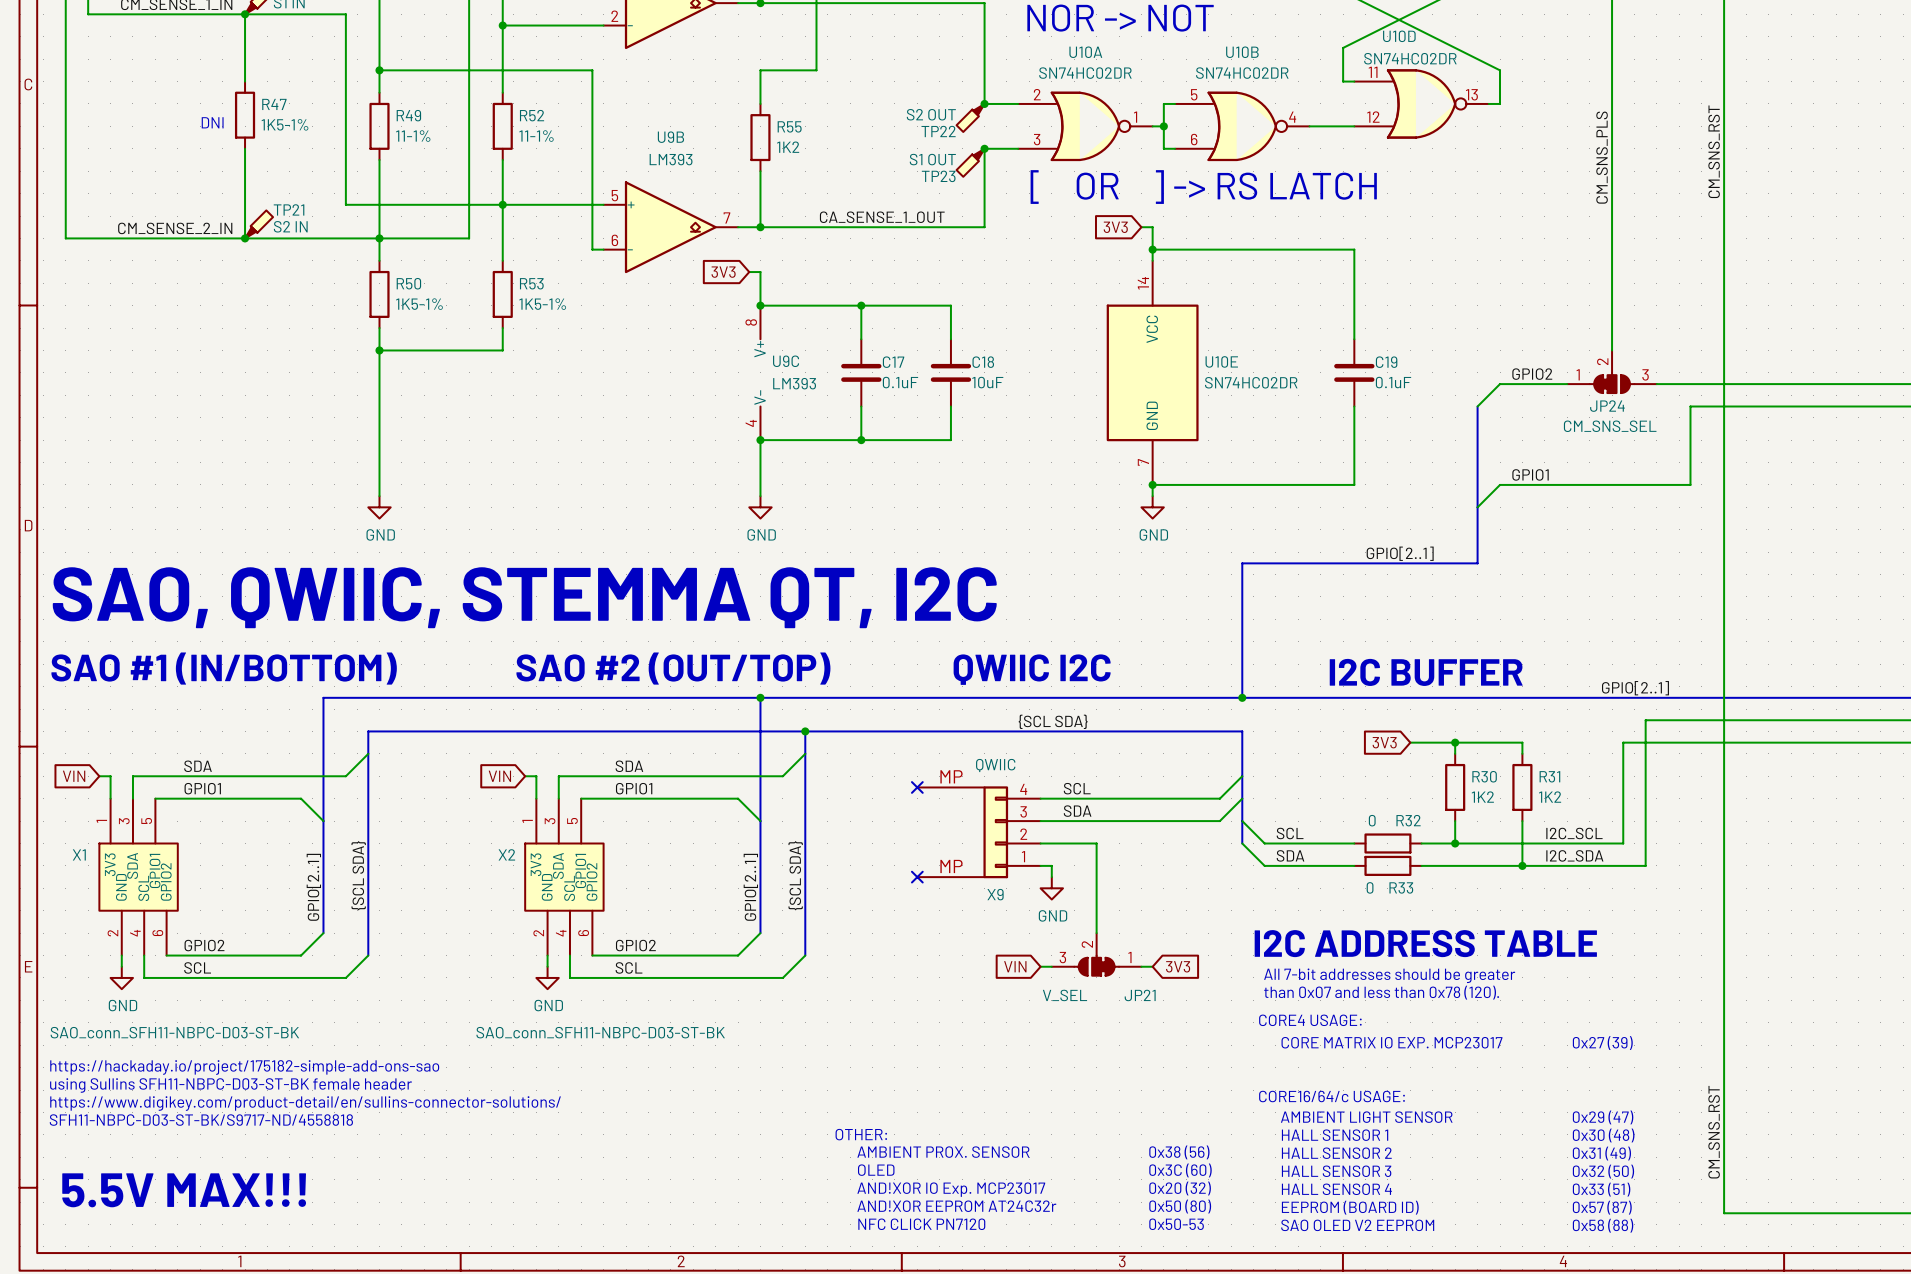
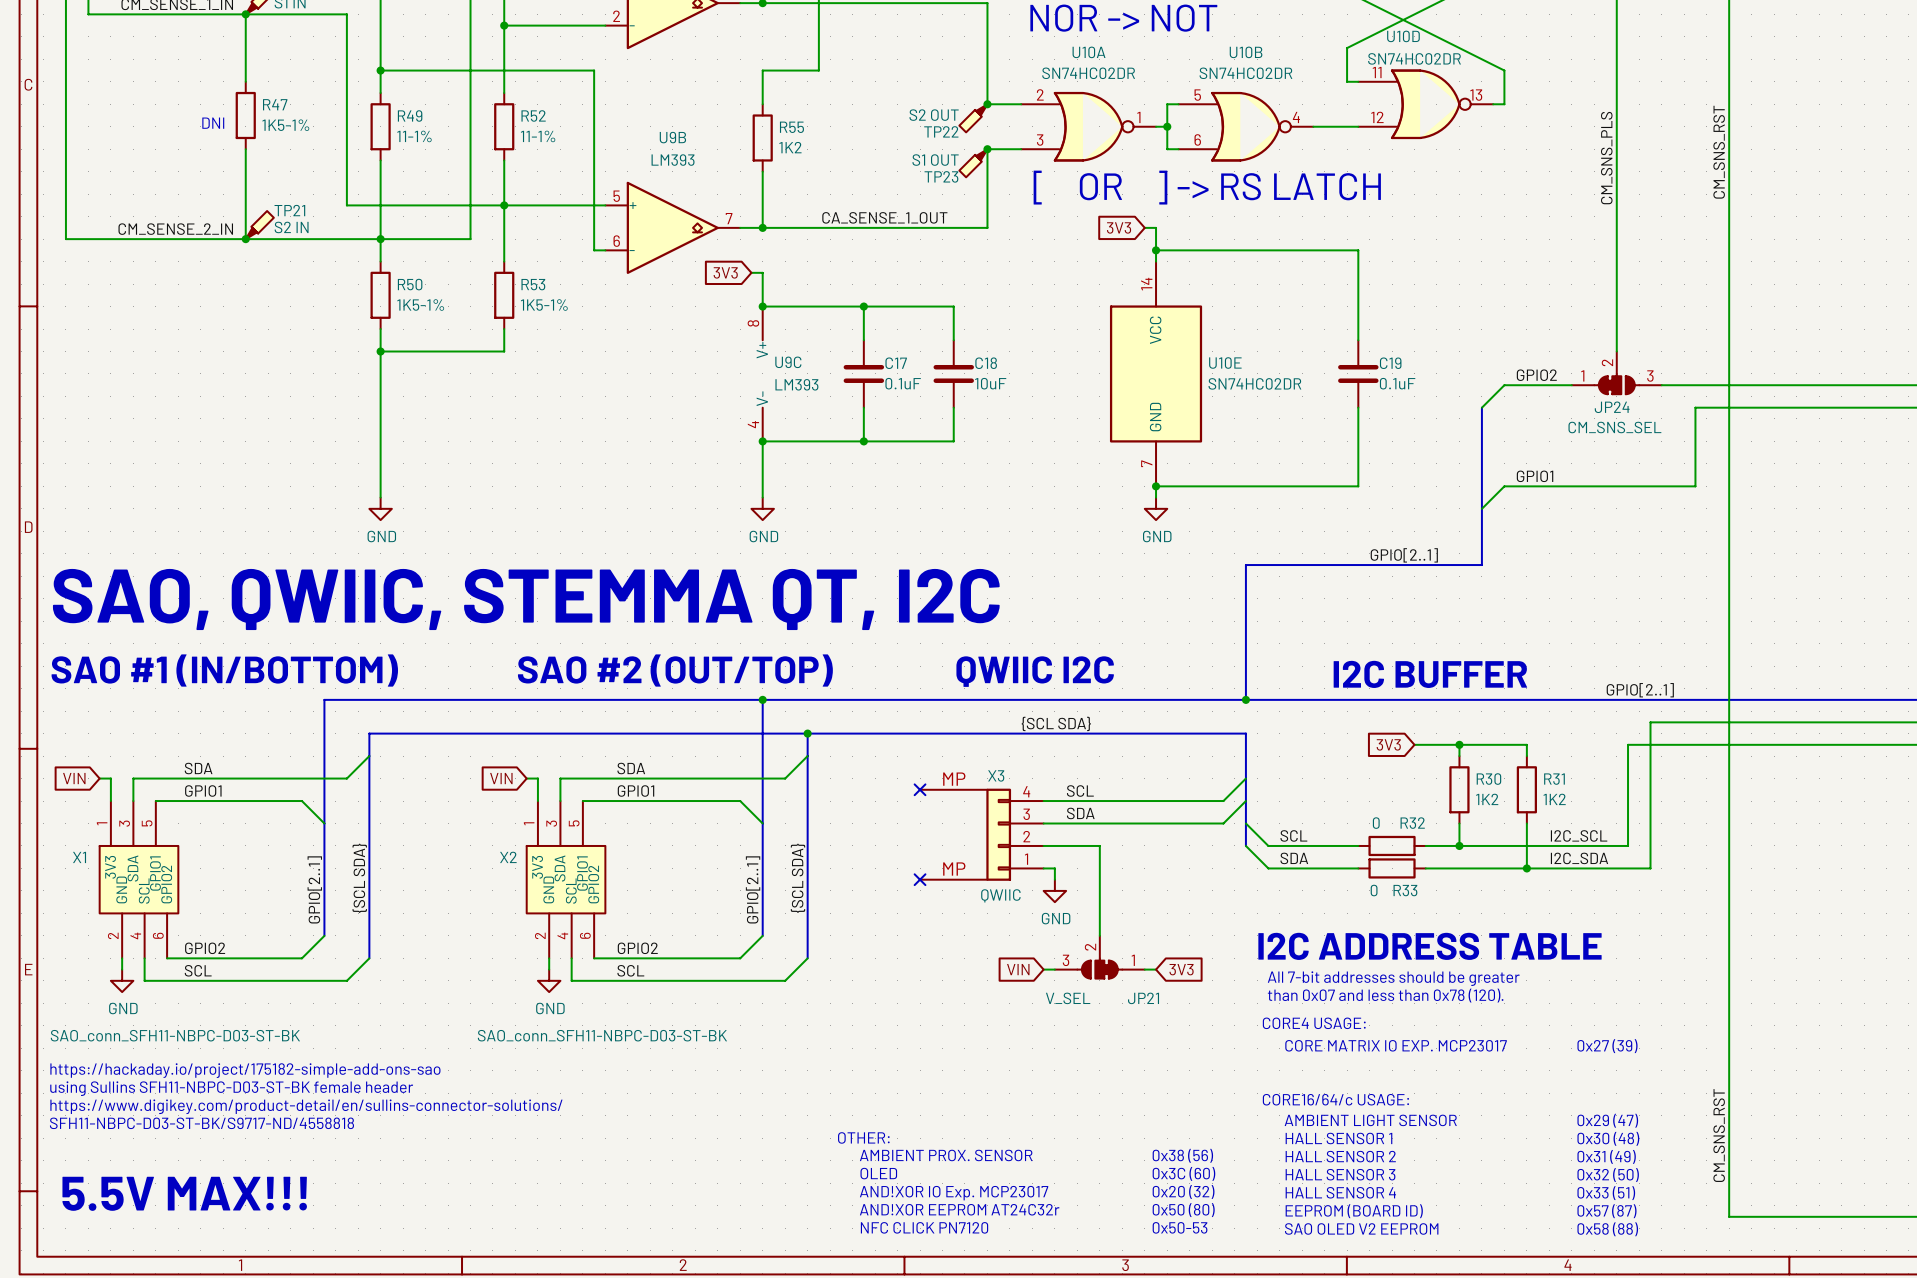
X9 value position: QWIIC (995, 765) -> QWIIC (1000, 895)
X9 name: X9 (995, 894) -> X3 (996, 775)

